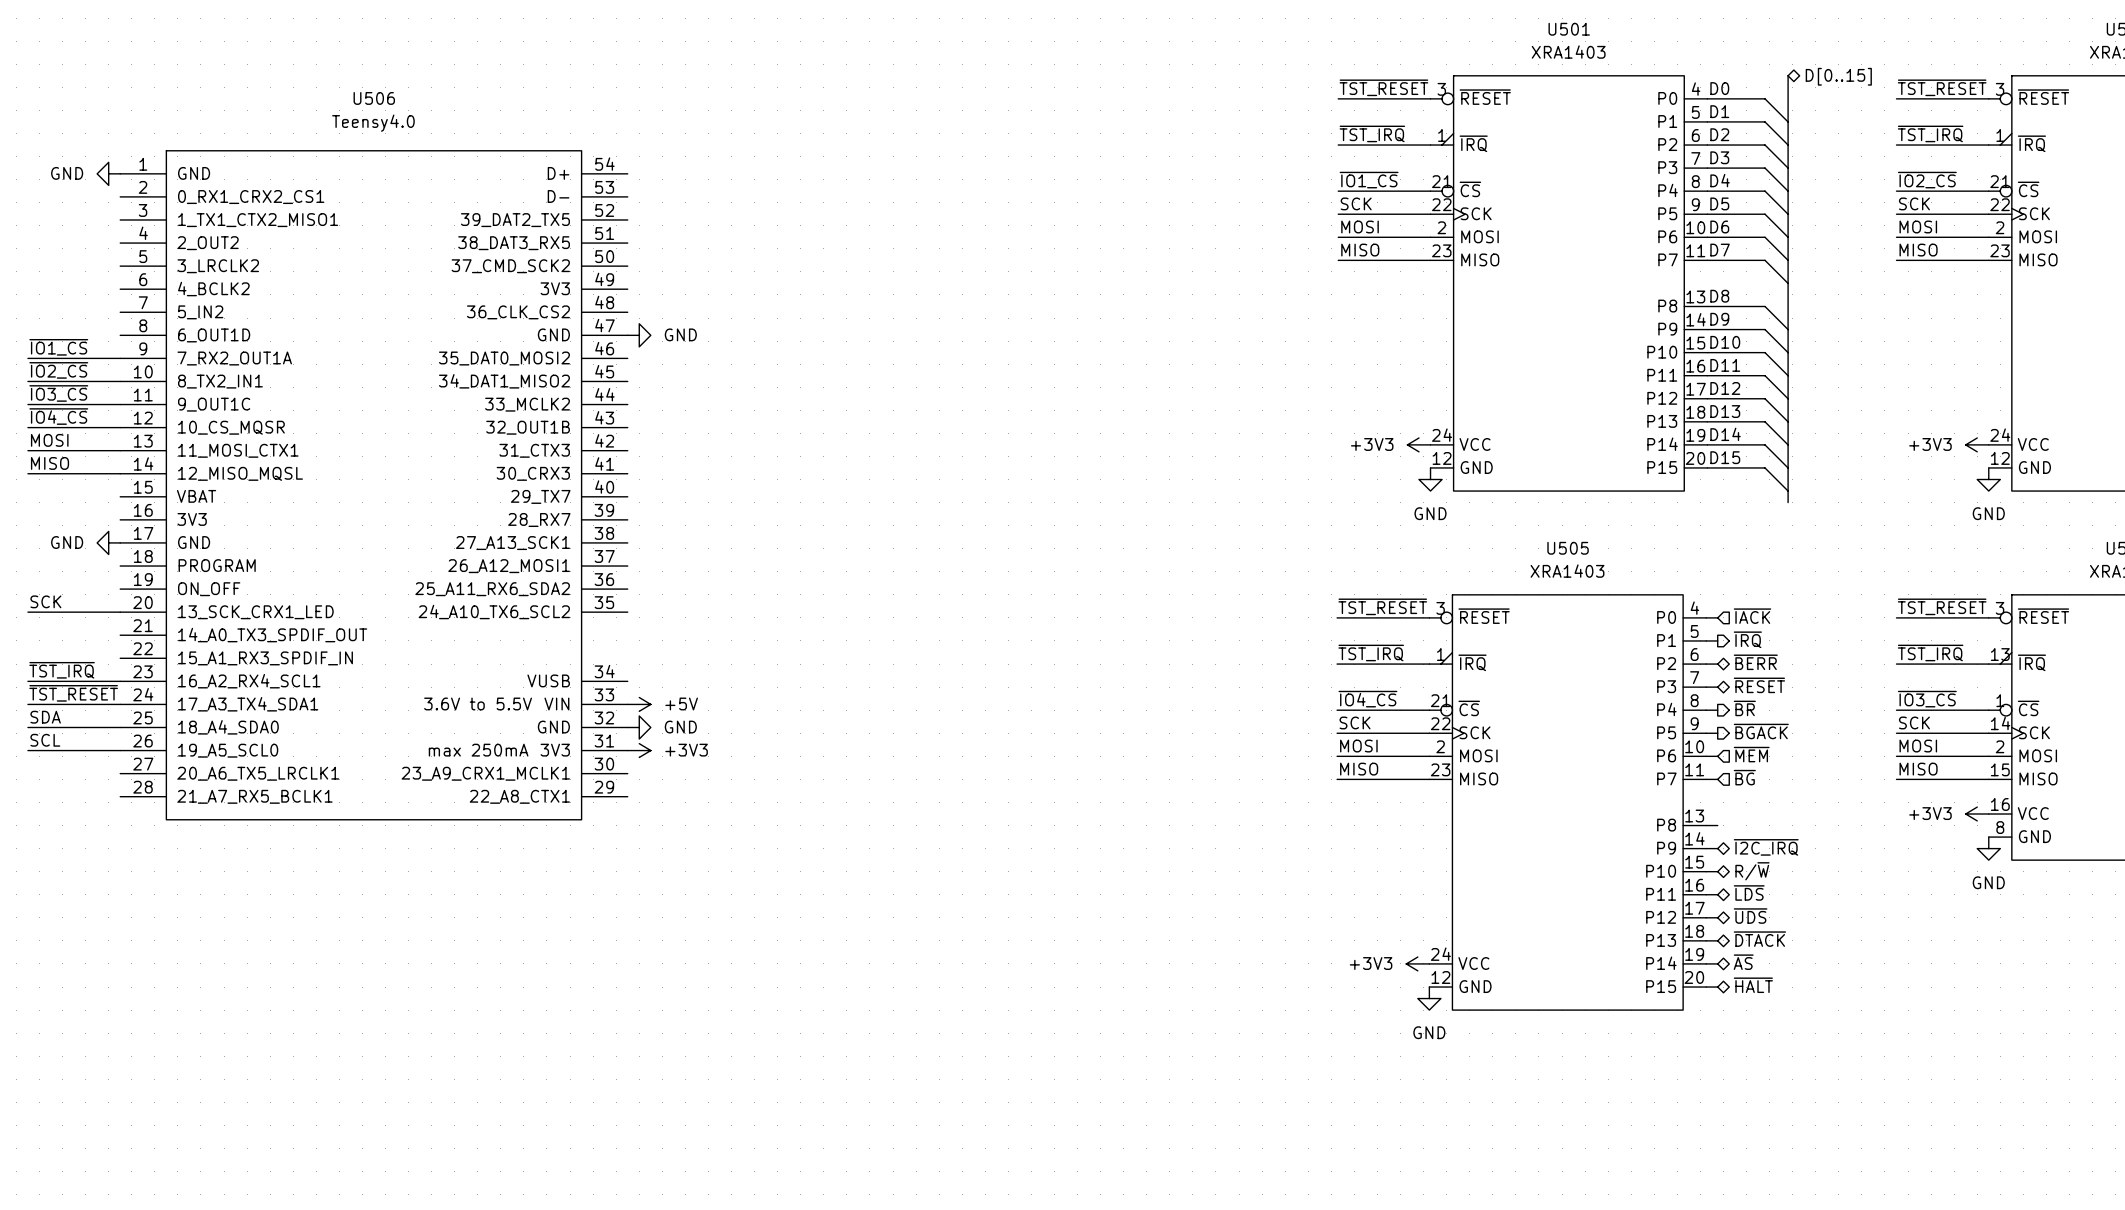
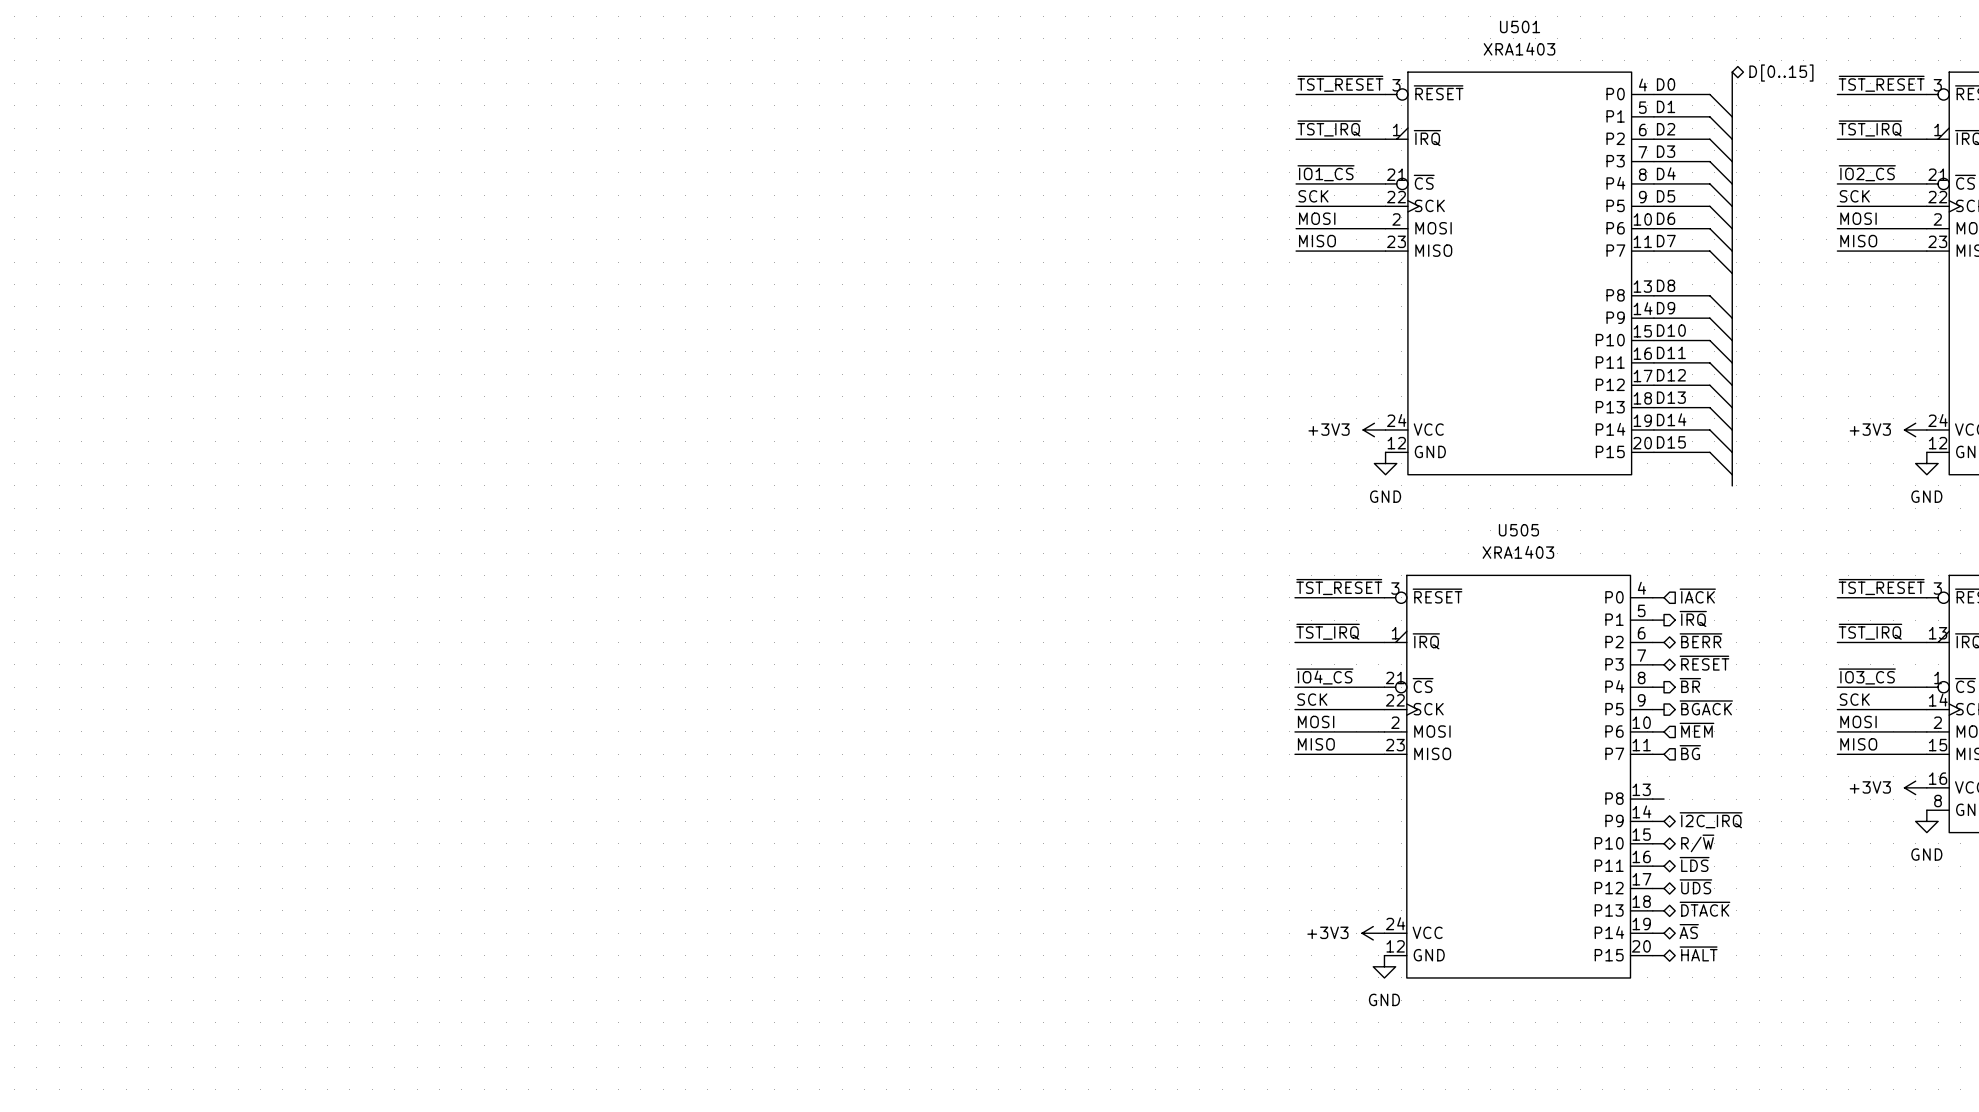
power symbol: GND (108, 173) -> none
power symbol: GND (639, 335) -> none
label: ~{IO1_CS} (58, 347) -> none
wire: (27, 358) (120, 358) -> none
label: ~{IO2_CS} (58, 370) -> none
wire: (27, 381) (120, 381) -> none
label: ~{IO3_CS} (58, 393) -> none
wire: (27, 404) (120, 404) -> none
label: ~{IO4_CS} (58, 416) -> none
wire: (27, 427) (120, 427) -> none
label: MOSI (49, 440) -> none
wire: (27, 450) (120, 450) -> none
label: MISO (50, 463) -> none
wire: (27, 473) (120, 473) -> none
U506: Teensy4.0 (373, 485) -> none
power symbol: GND (108, 542) -> none
label: SCK (45, 601) -> none
wire: (27, 612) (120, 612) -> none
label: ~{TST_IRQ} (62, 670) -> none
wire: (27, 681) (120, 681) -> none
label: ~{TST_RESET} (73, 693) -> none
wire: (27, 704) (120, 704) -> none
power symbol: +5V (639, 704) -> none
label: SDA (45, 717) -> none
wire: (27, 727) (120, 727) -> none
power symbol: GND (639, 727) -> none
label: SCL (45, 740) -> none
wire: (27, 750) (120, 750) -> none
power symbol: +3V3 (639, 750) -> none

